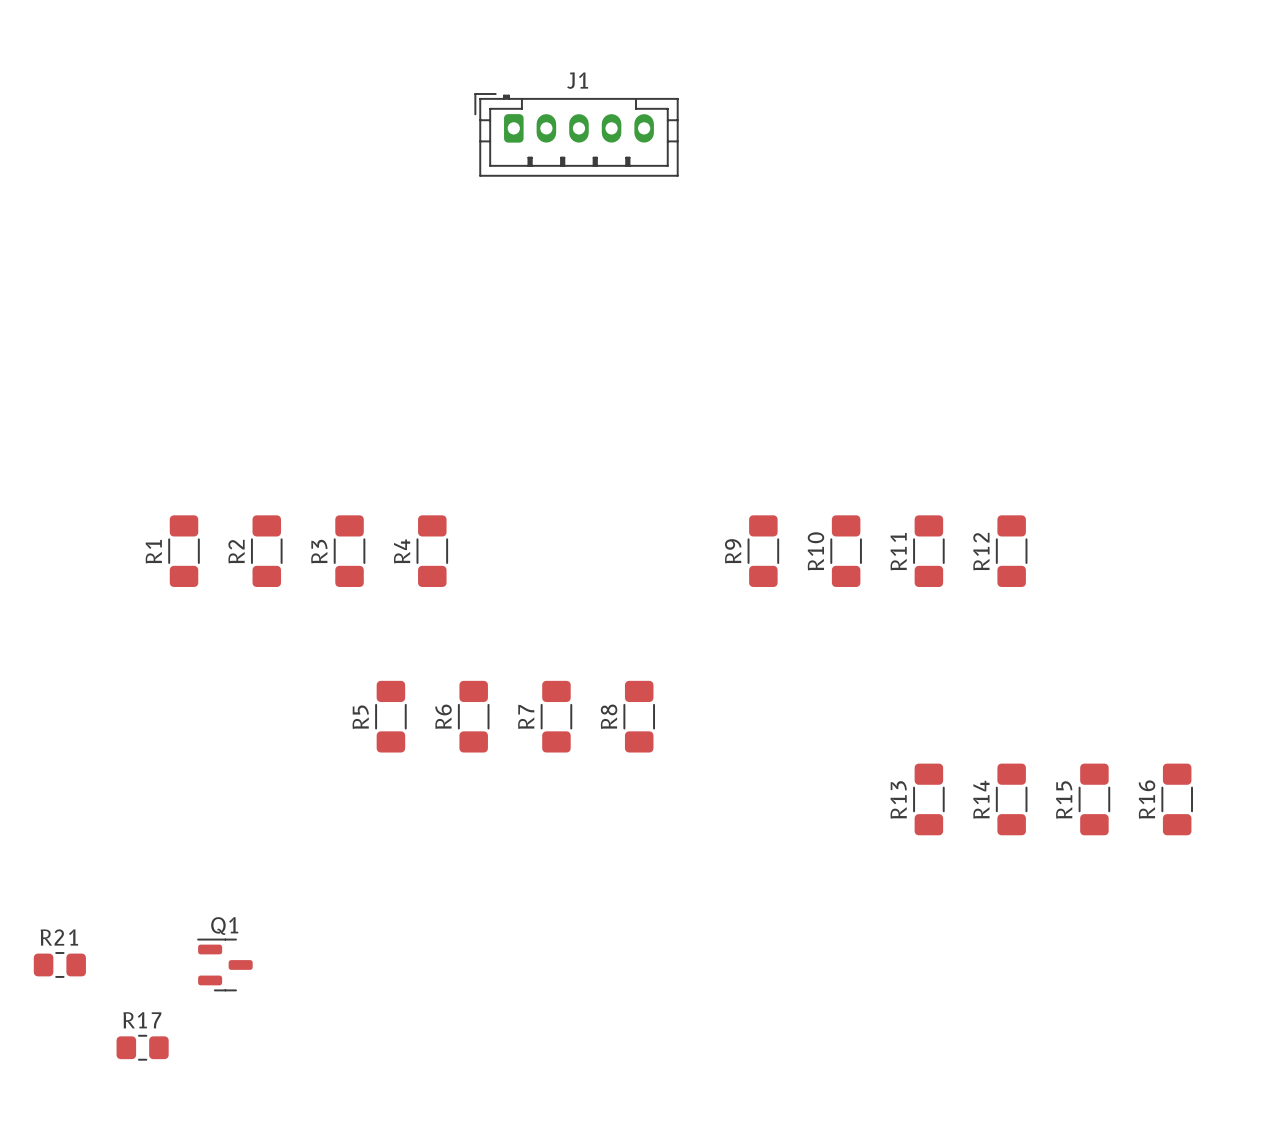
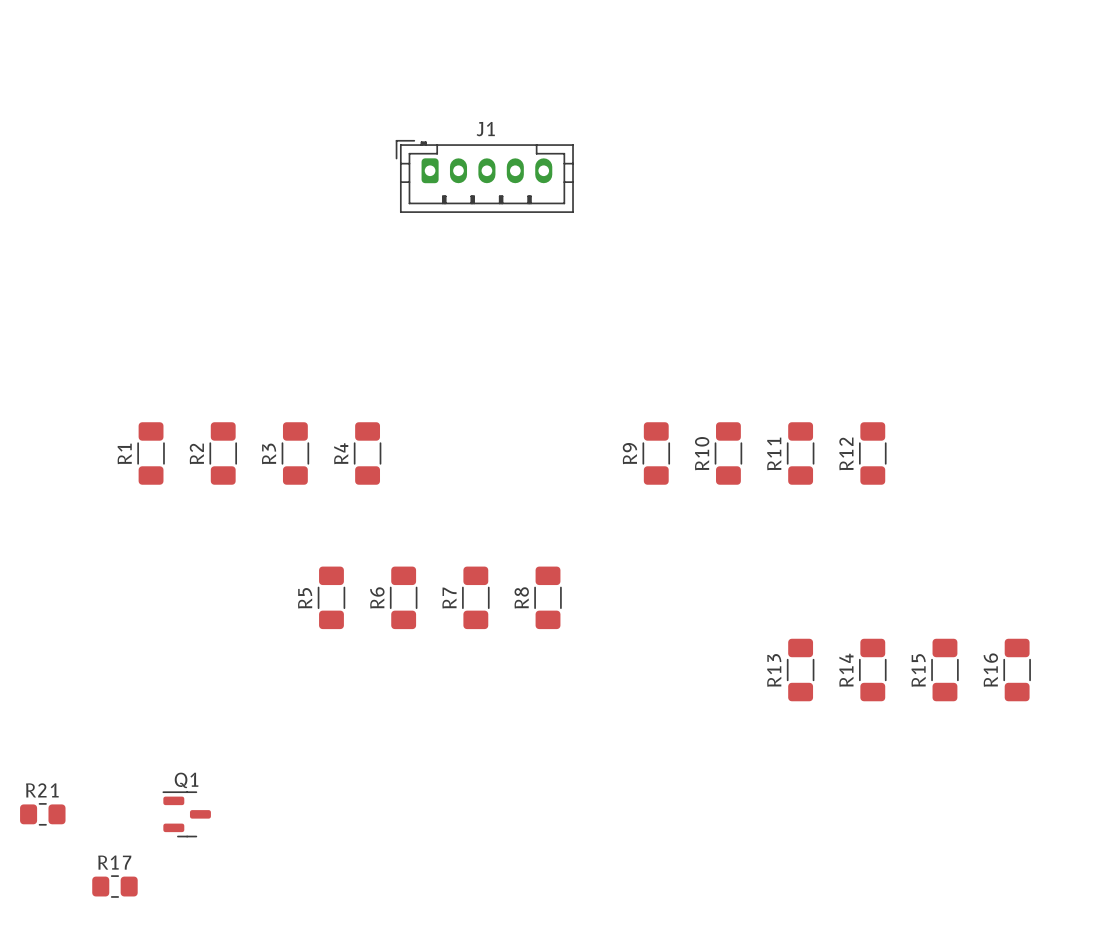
J1 position: (576, 134) -> (484, 176)

